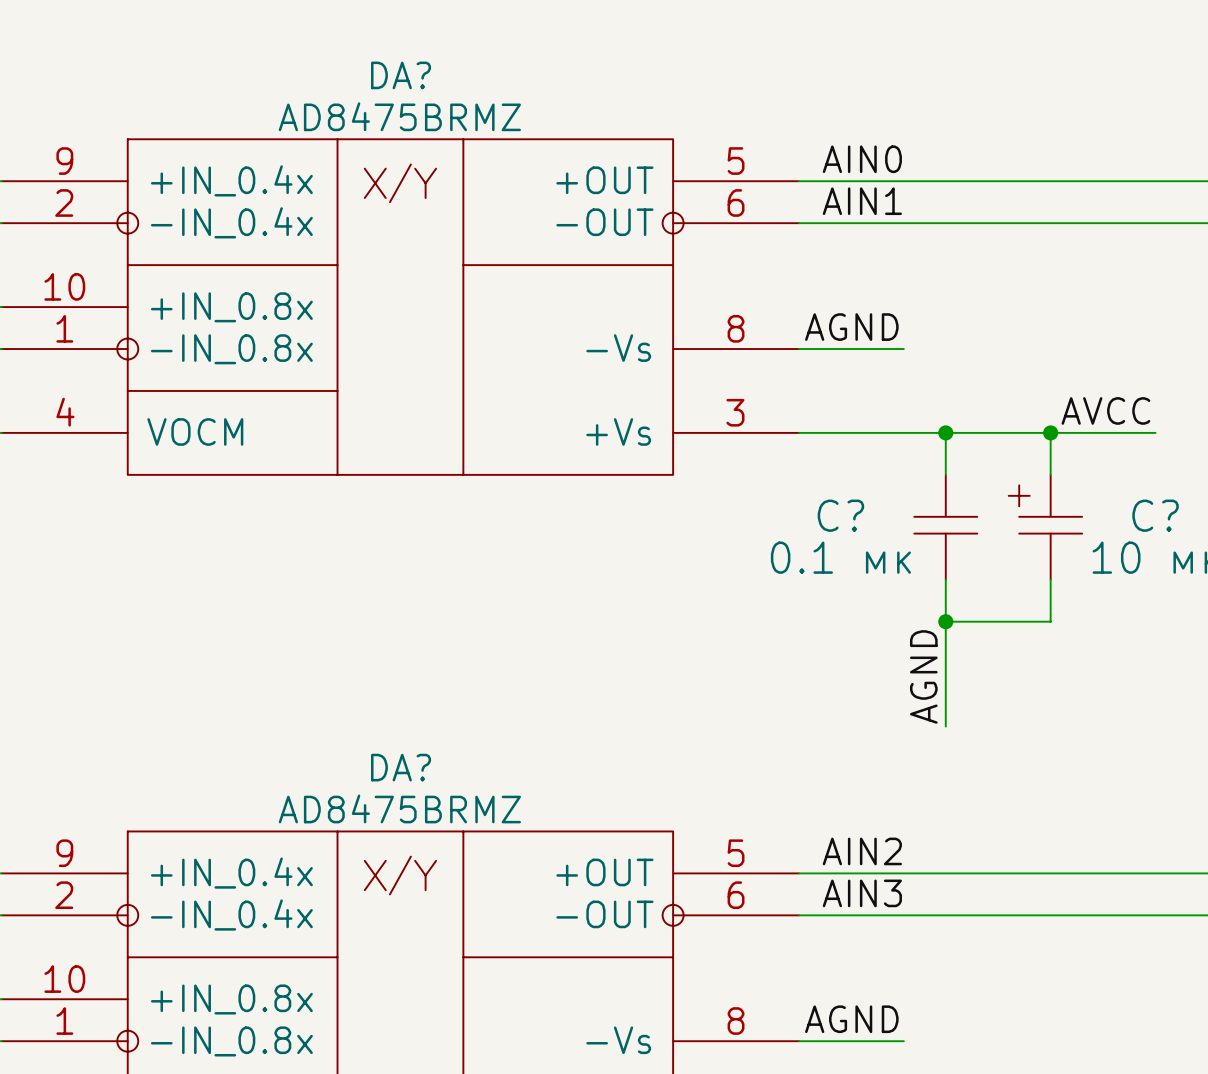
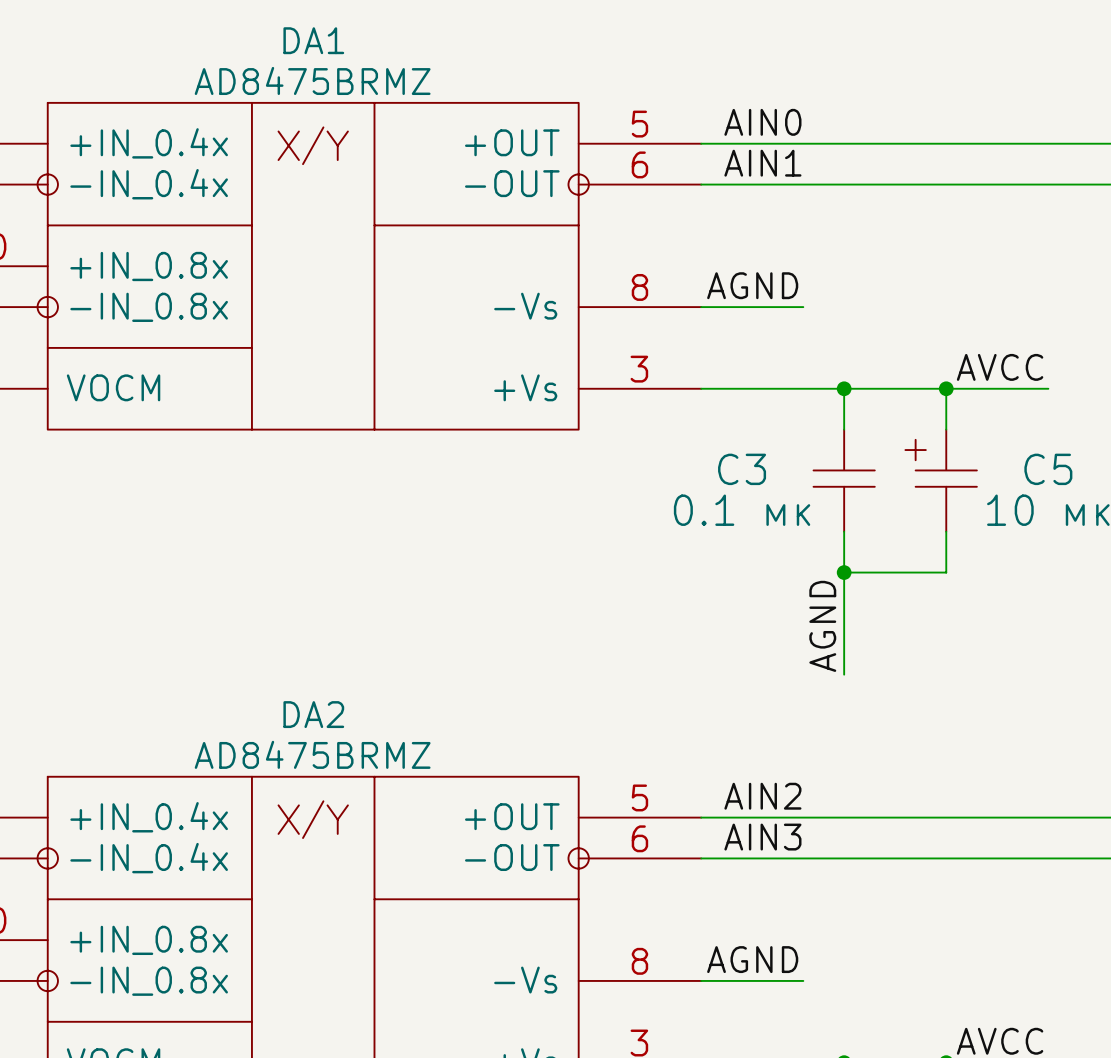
DA? name: DA? (401, 75) -> DA1 (313, 40)
C? name: C? (840, 515) -> C3 (742, 469)
C? name: C? (1155, 515) -> C5 (1048, 469)
DA? name: DA? (401, 767) -> DA2 (313, 714)

